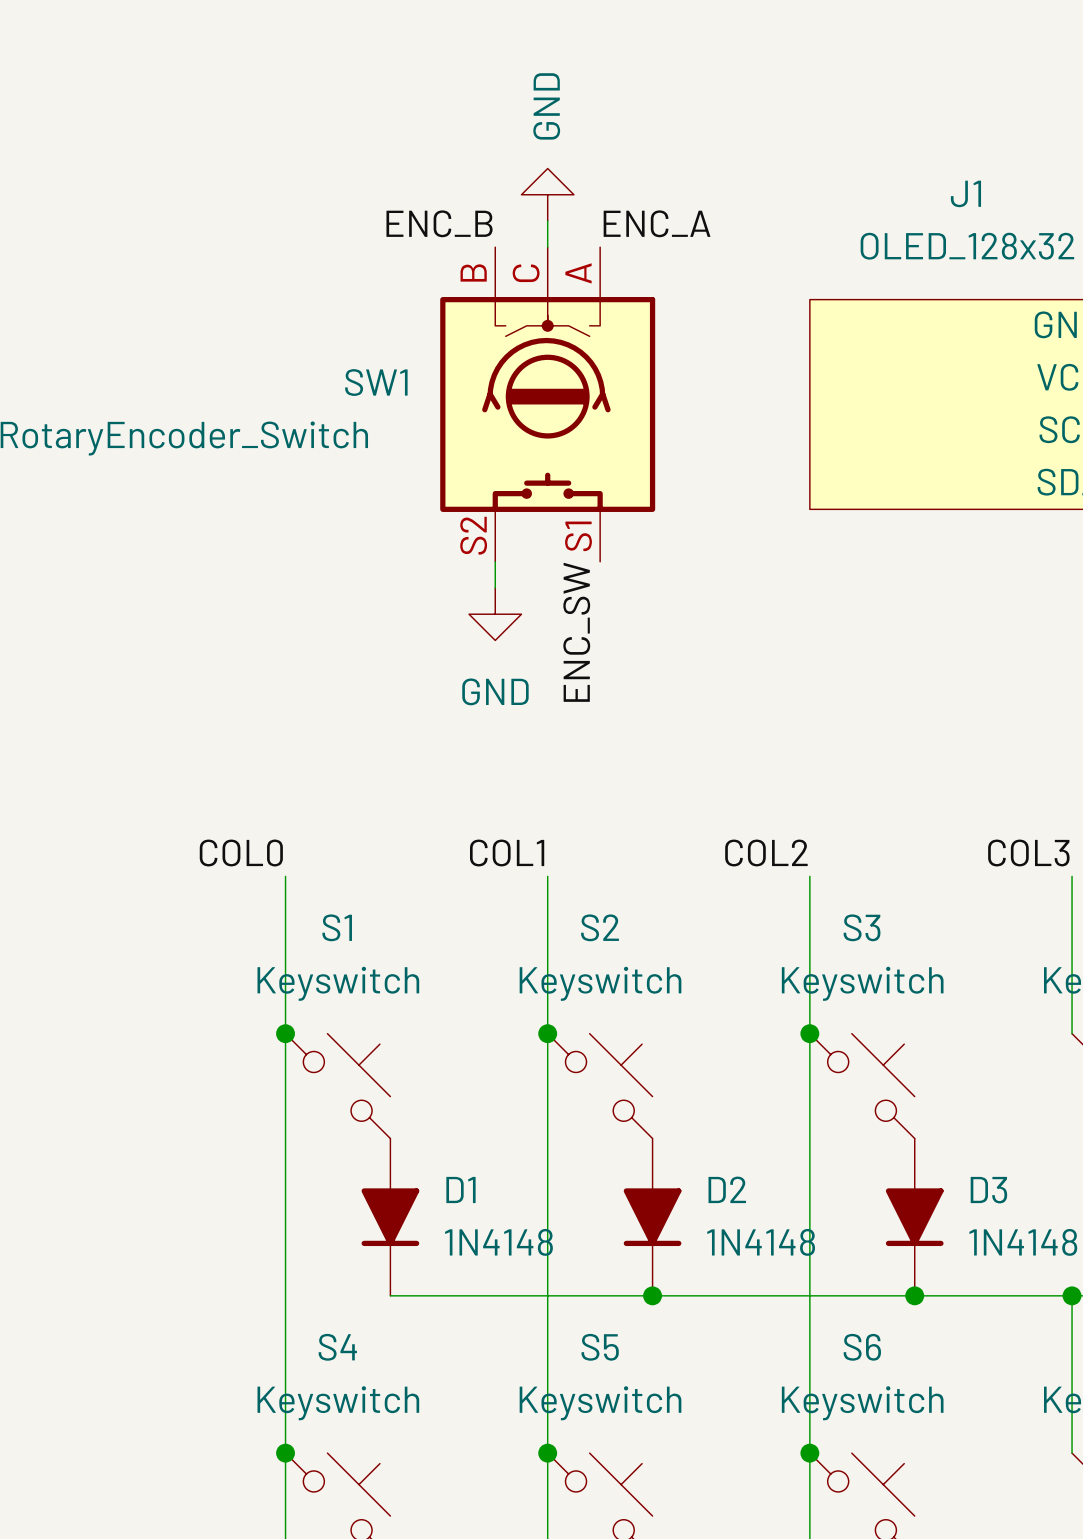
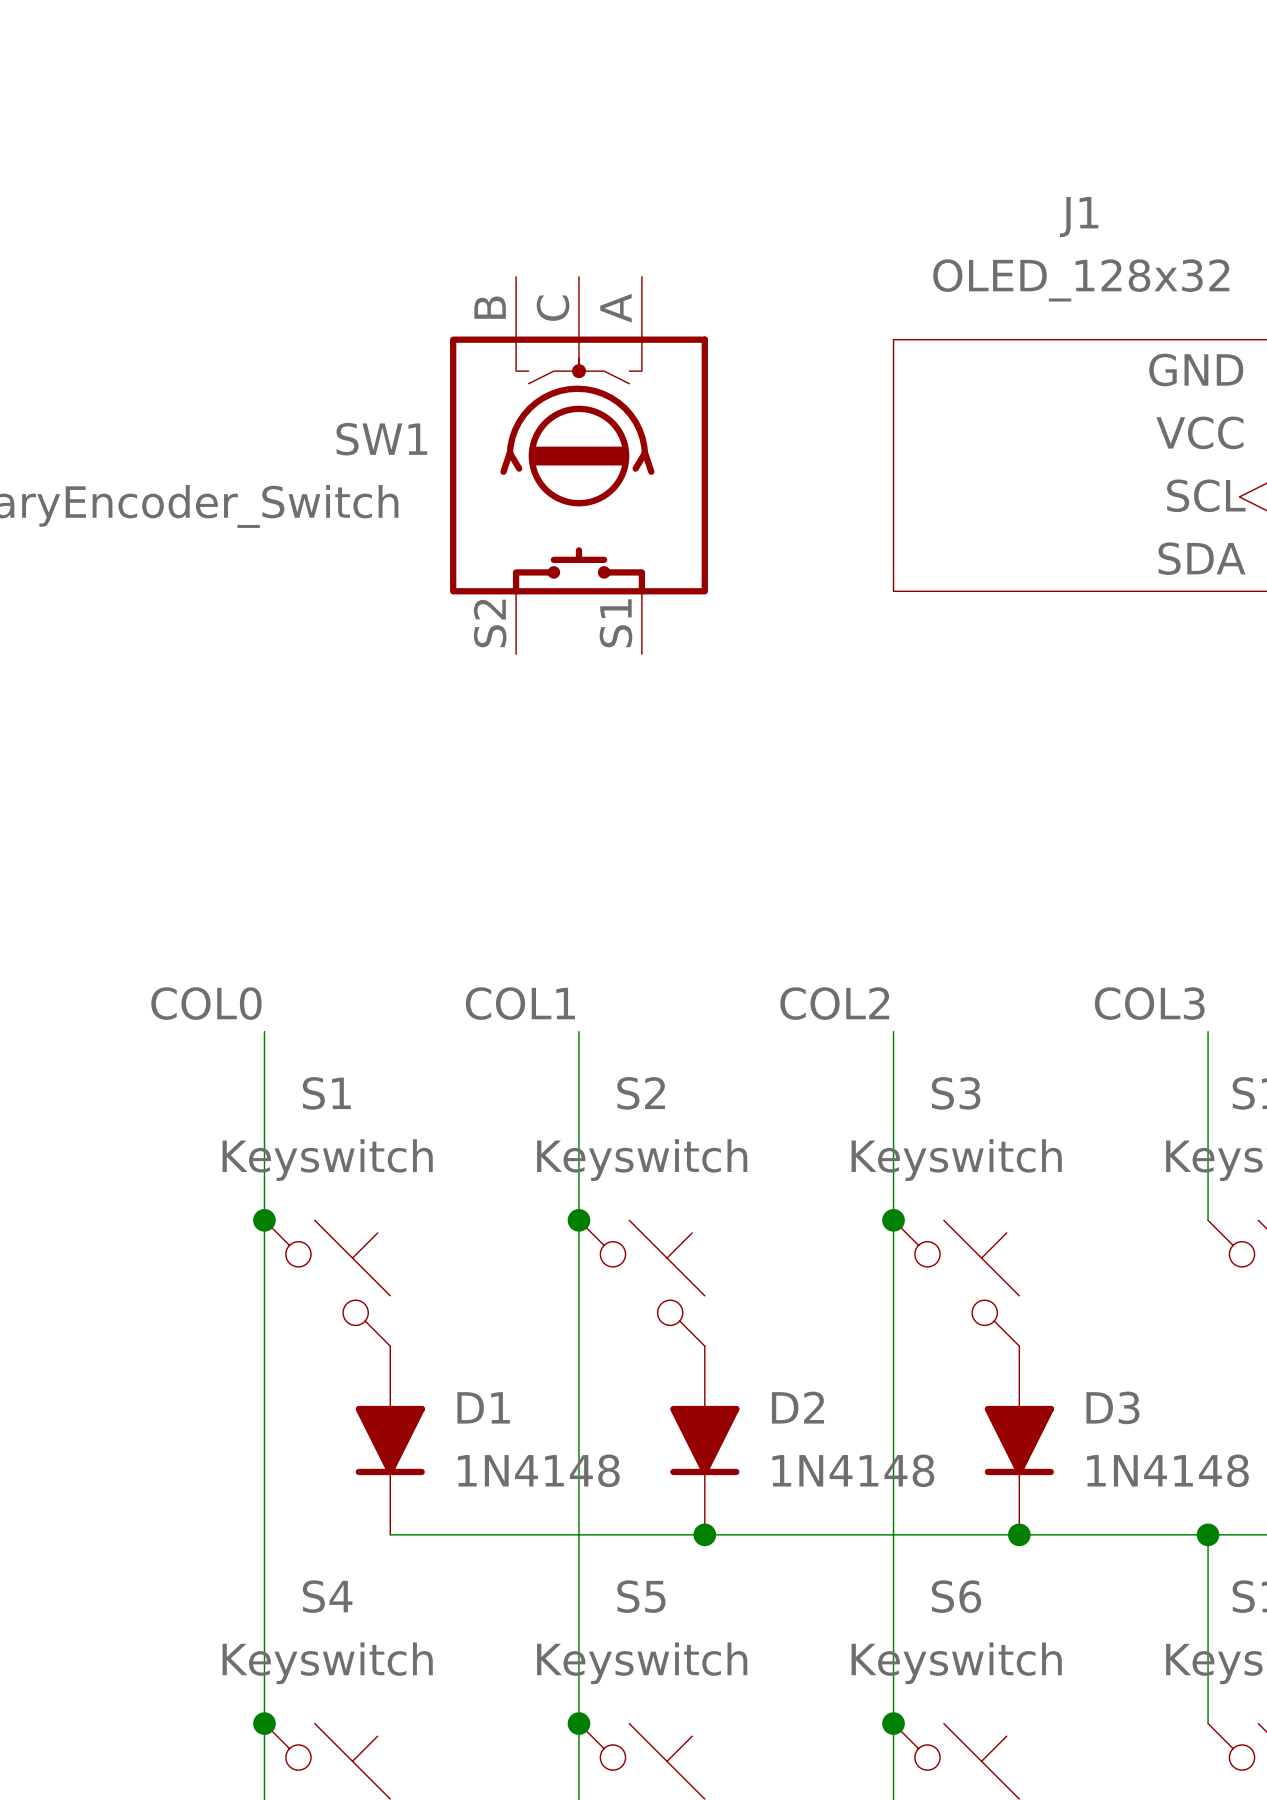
power symbol: GND (547, 194) -> none
wire: (547, 220) (547, 247) -> none
label: ENC_B (439, 223) -> none
label: ENC_A (657, 223) -> none
wire: (495, 561) (495, 588) -> none
power symbol: GND (495, 614) -> none
label: ENC_SW (576, 632) -> none

